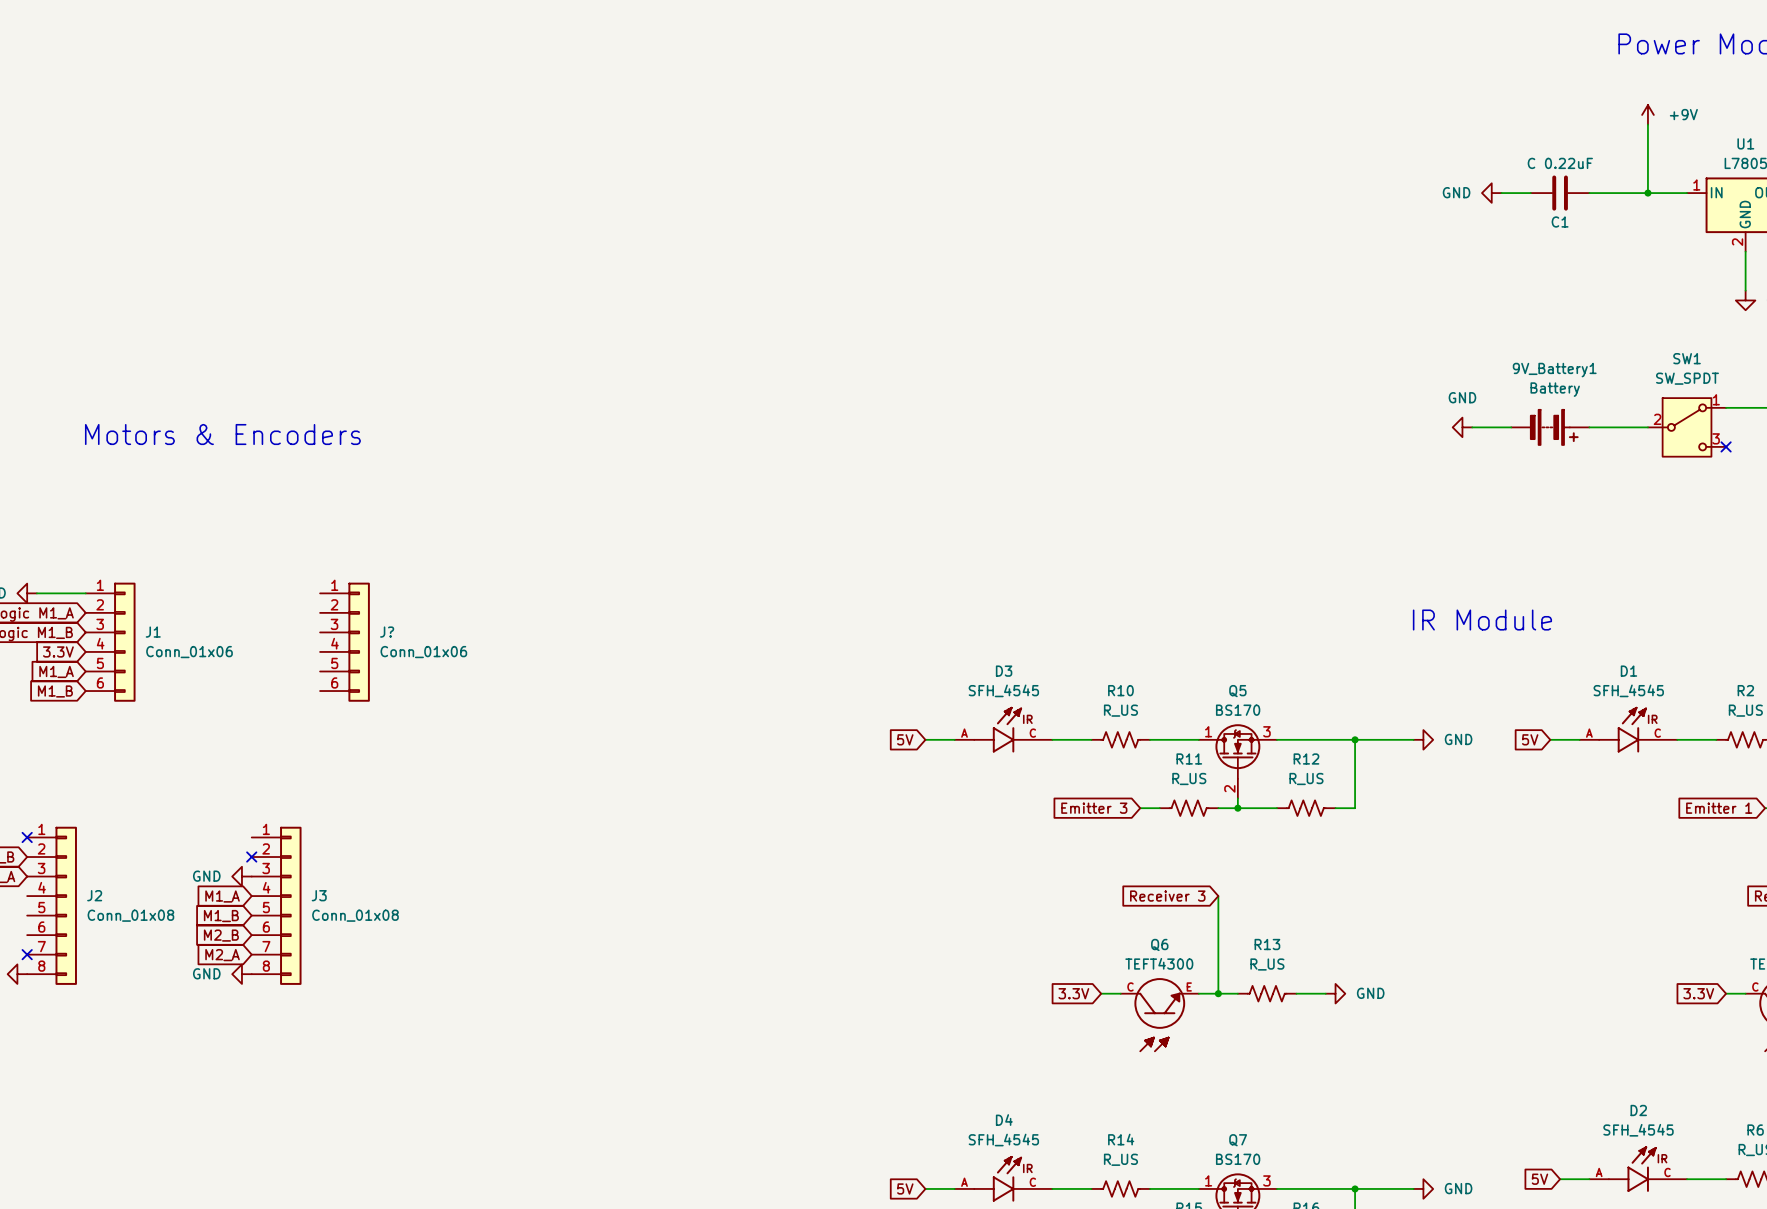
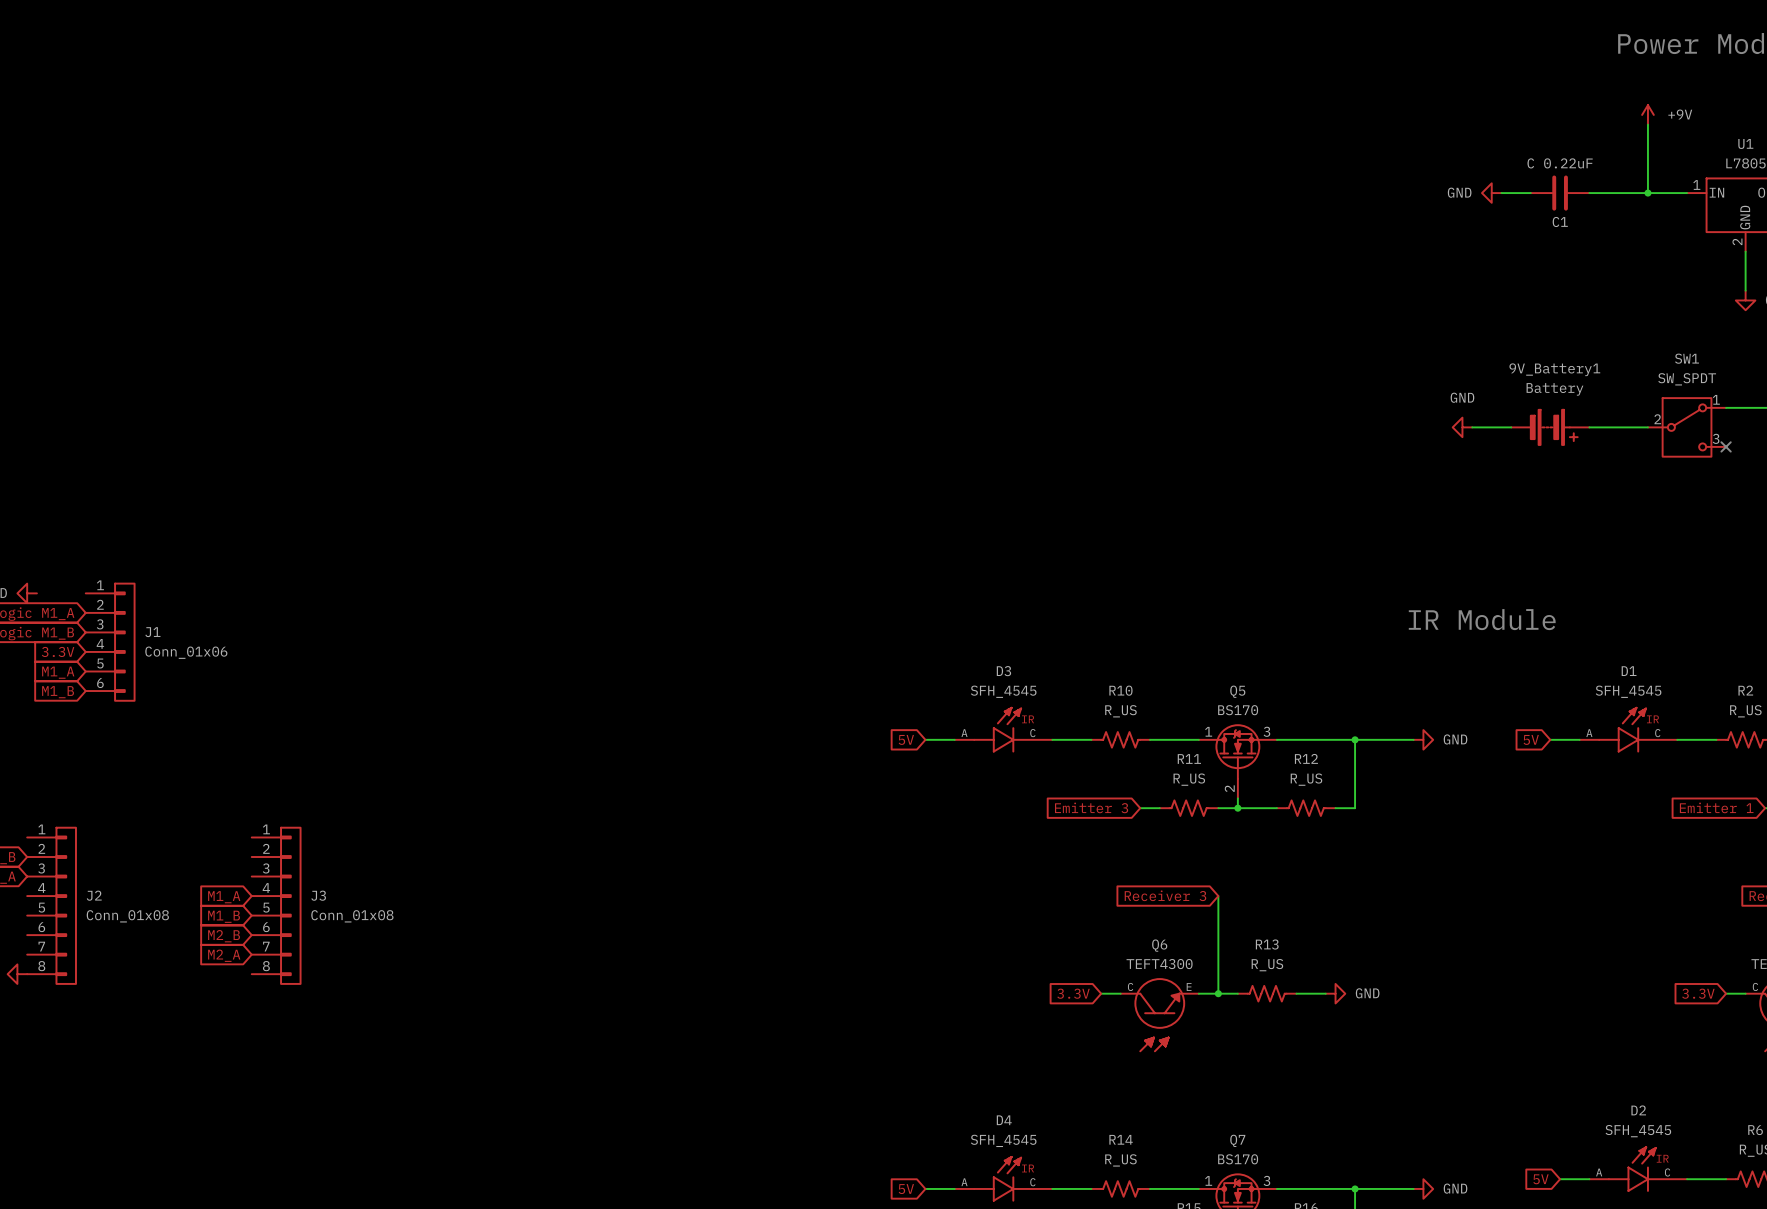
text: Motors & Encoders (222, 434) -> none
wire: (36, 593) (85, 593) -> none
J?: Conn_01x06 (344, 642) -> none
no-connect mark: (27, 837) -> none
no-connect mark: (251, 857) -> none
power symbol: GND (241, 876) -> none
no-connect mark: (27, 954) -> none
power symbol: GND (241, 974) -> none

